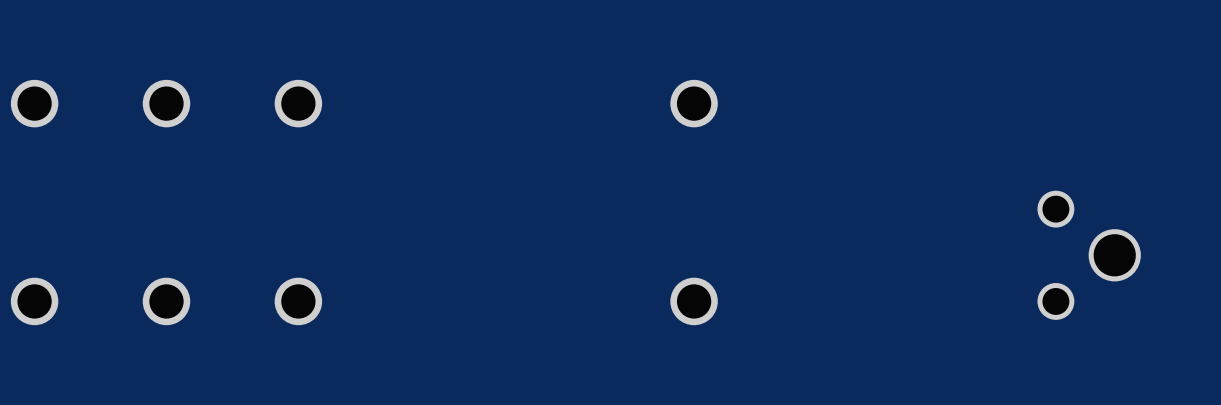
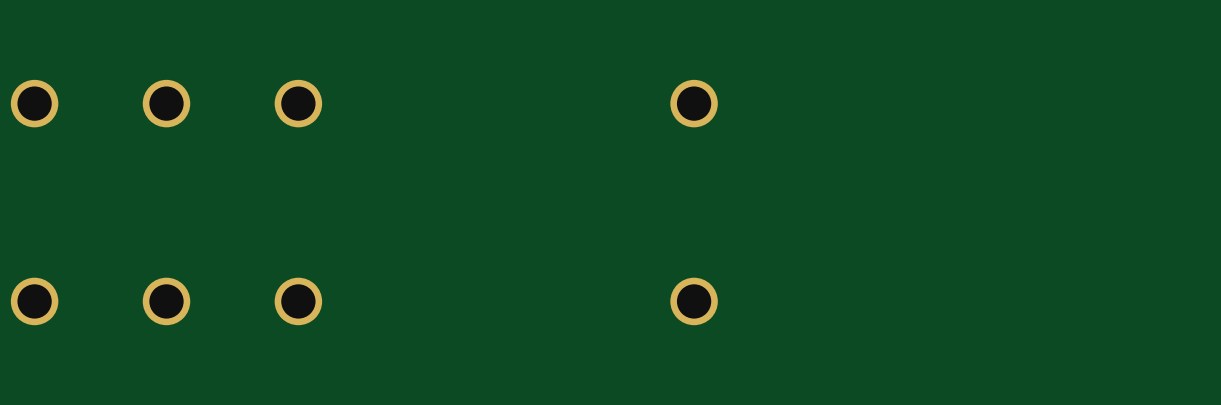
part: (1089, 255) -> none

